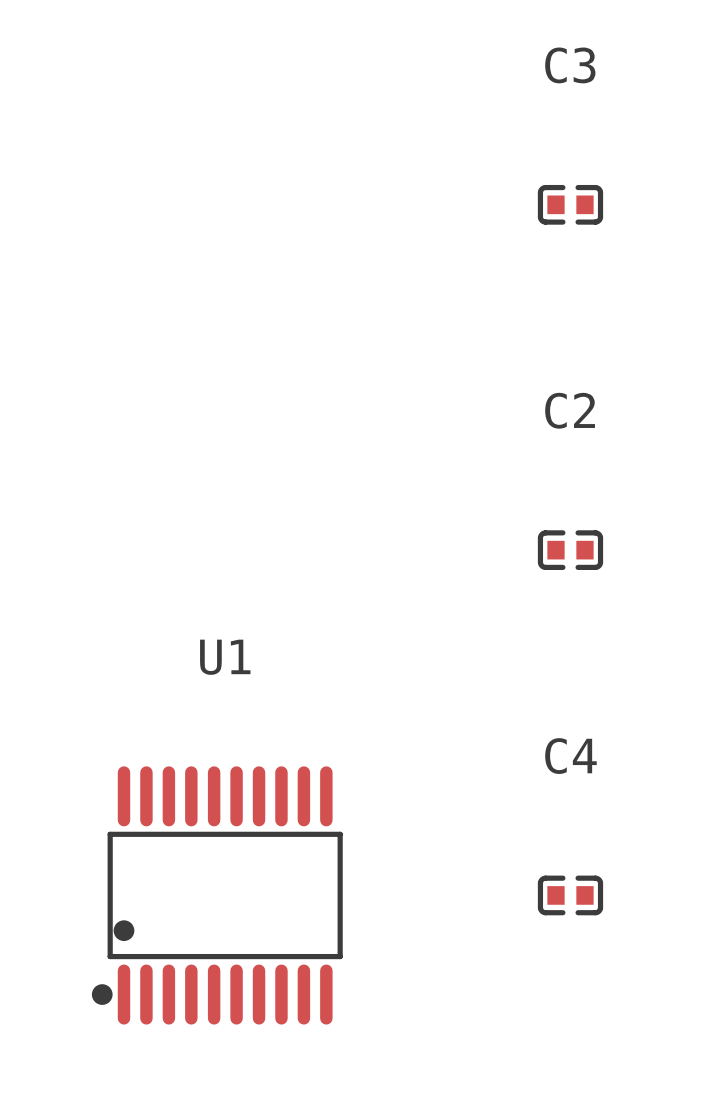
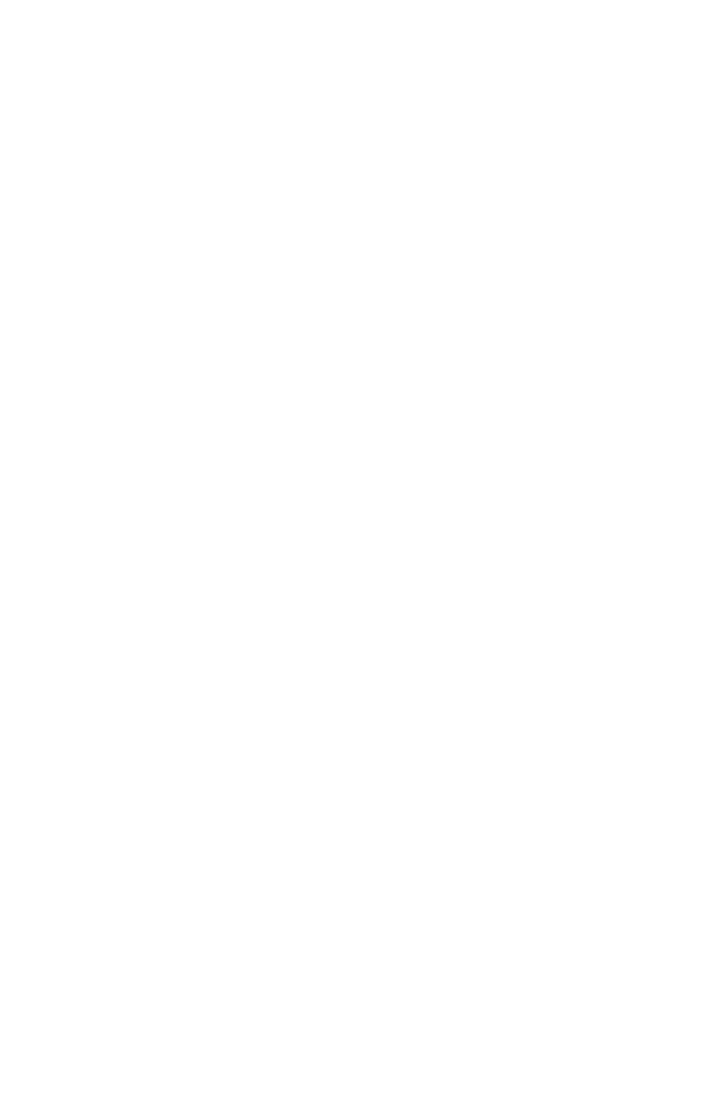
C3: (570, 204) -> none
C2: (570, 550) -> none
U1: (217, 895) -> none
C4: (570, 895) -> none

